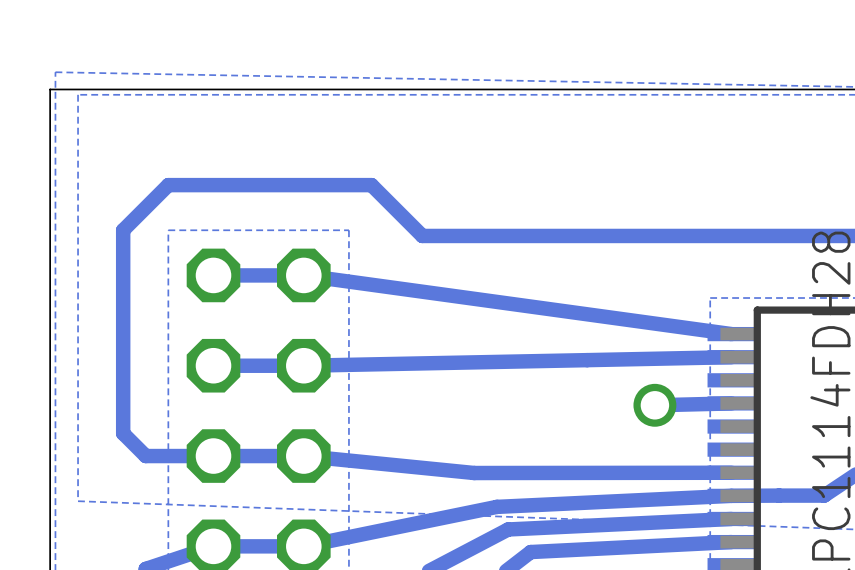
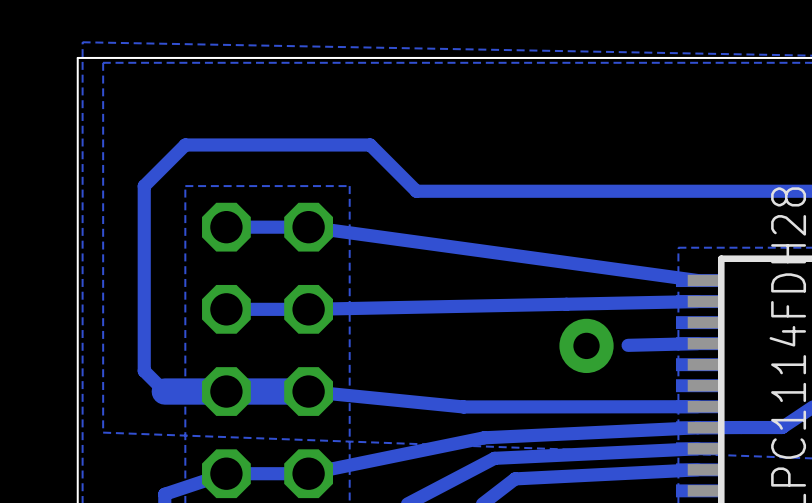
via: none -> (586, 345)
via: (654, 405) -> none
track width: thin (303, 456) (145, 456) -> thick (308, 391) (164, 391)

